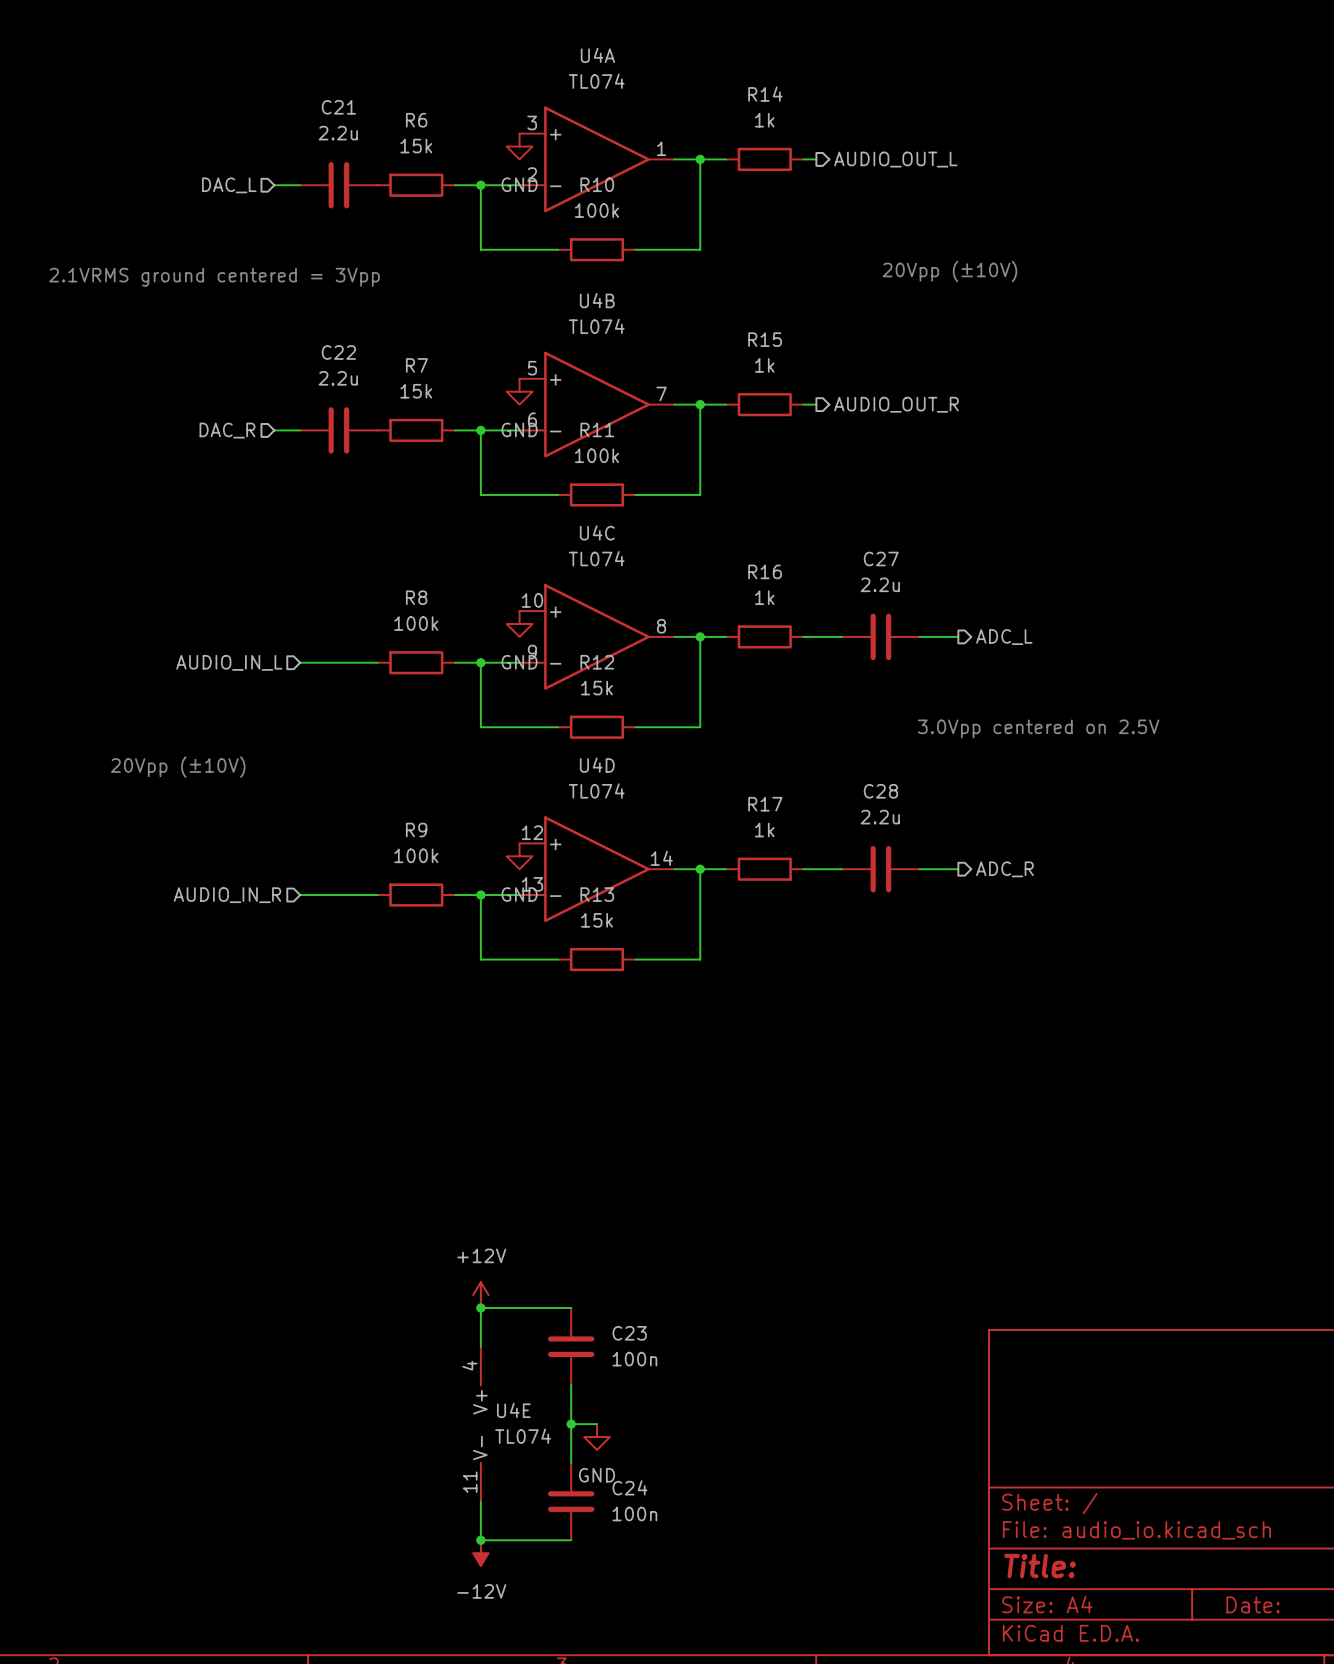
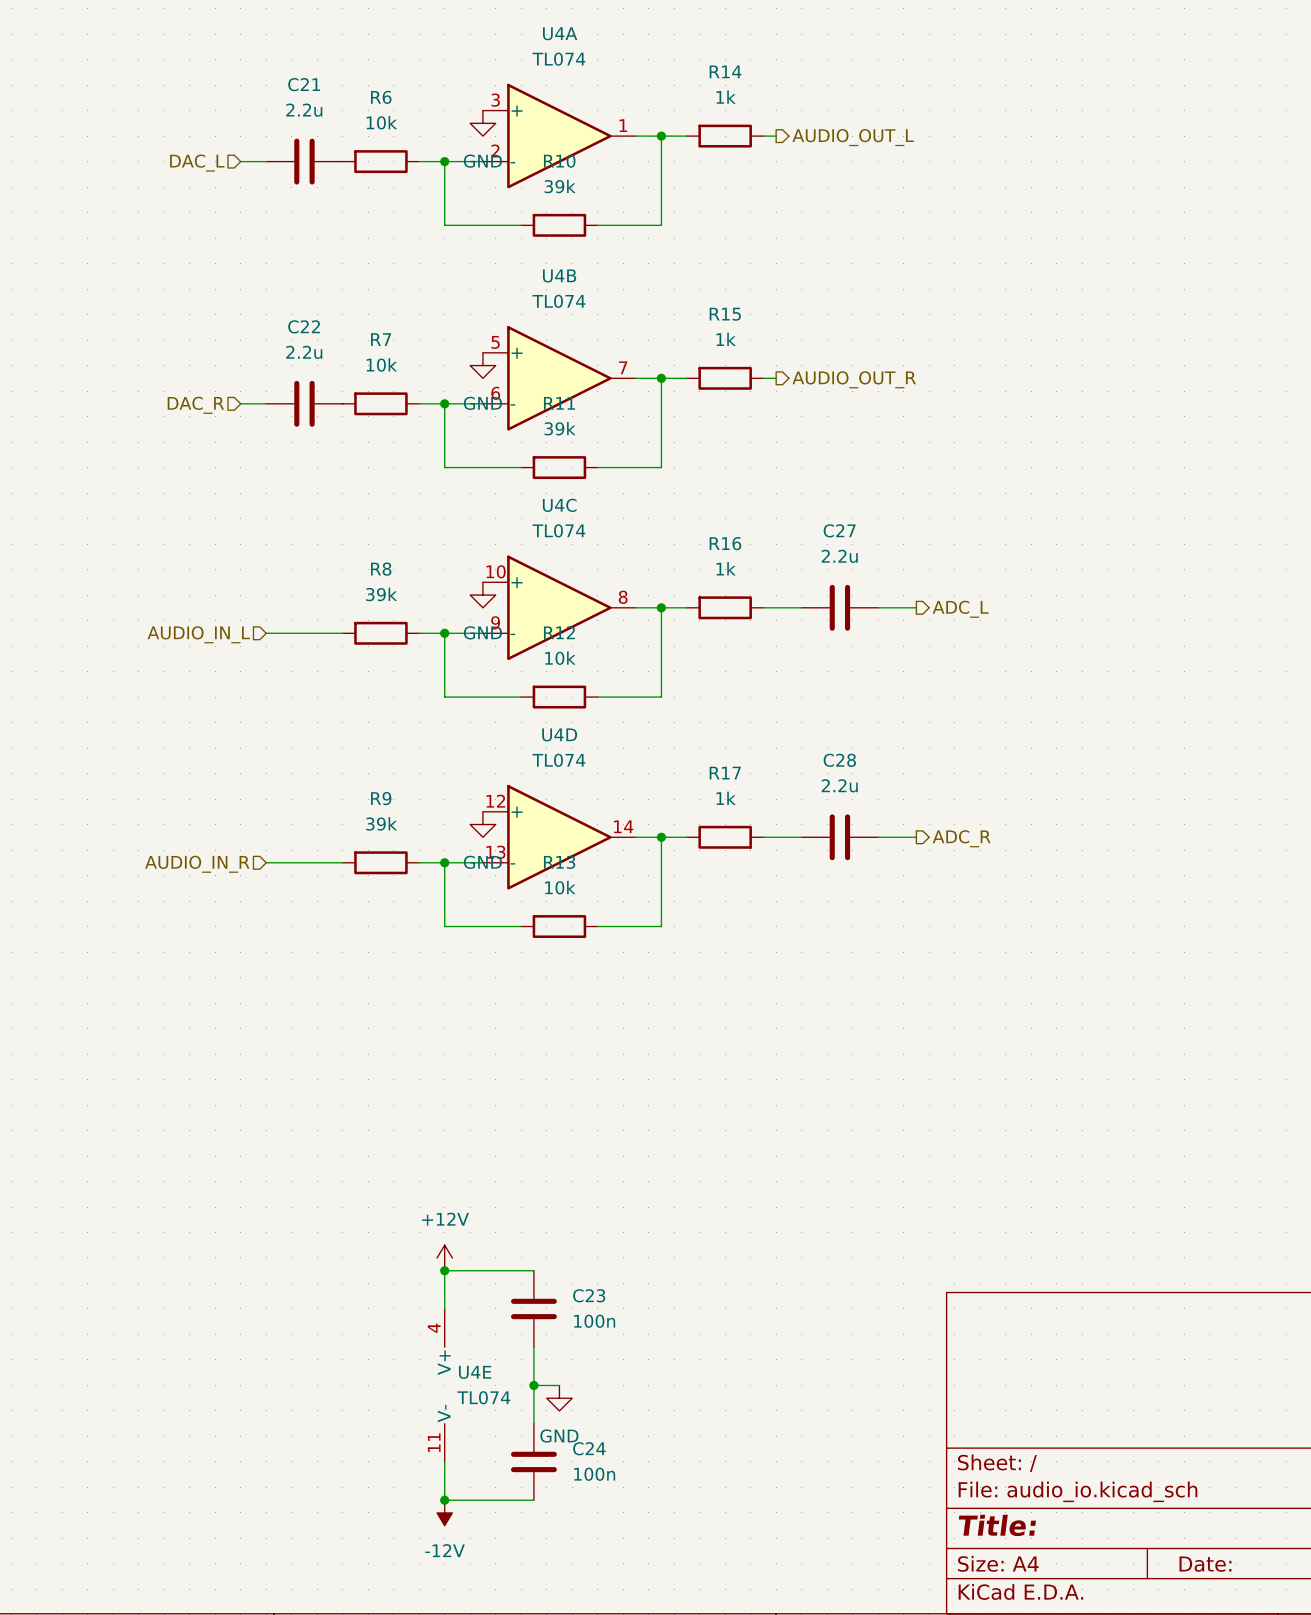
R6 value: 15k (416, 146) -> 10k (381, 122)
R10 value: 100k (597, 210) -> 39k (560, 186)
text: 20Vpp (±10V) (949, 271) -> none
text: 2.1VRMS ground centered = 3Vpp (214, 277) -> none
R7 value: 15k (416, 391) -> 10k (381, 364)
R11 value: 100k (597, 455) -> 39k (560, 428)
R8 value: 100k (416, 623) -> 39k (381, 594)
R12 value: 15k (597, 688) -> 10k (560, 658)
text: 3.0Vpp centered on 2.5V (1038, 728) -> none
text: 20Vpp (±10V) (178, 767) -> none
R9 value: 100k (416, 855) -> 39k (381, 823)
R13 value: 15k (597, 920) -> 10k (560, 887)

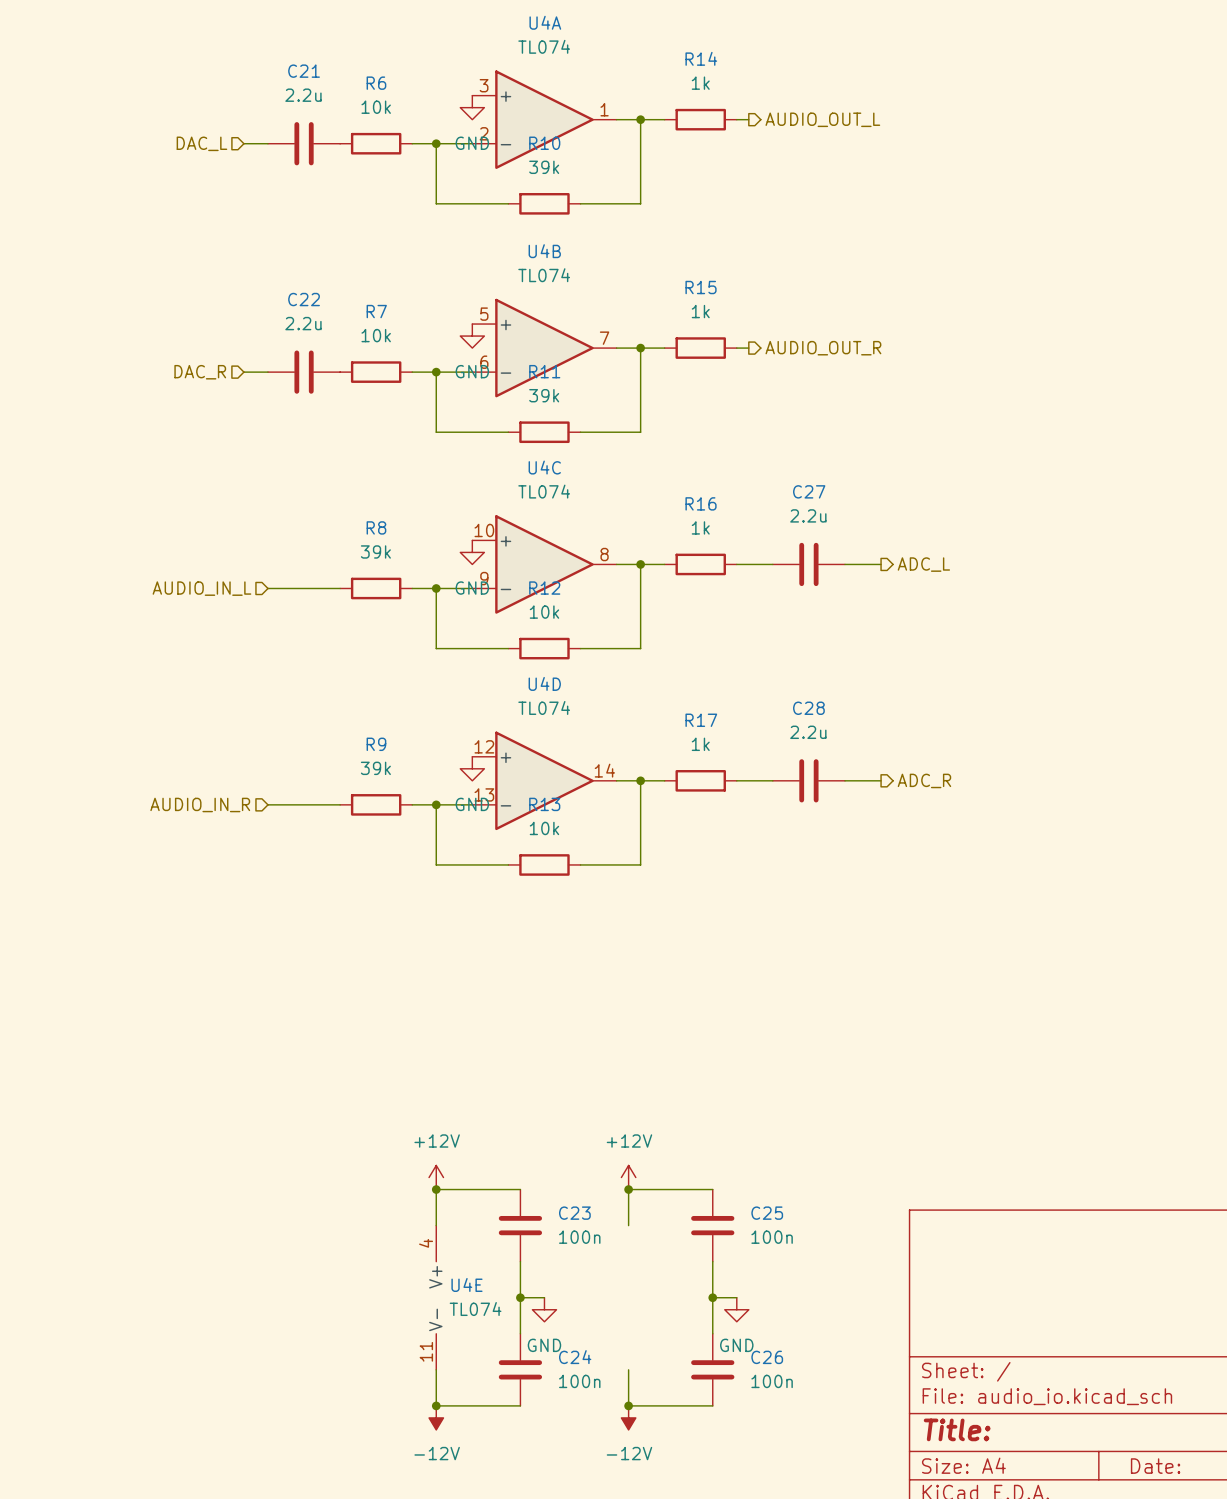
power symbol: none -> +12V (628, 1177)
junction: none -> (628, 1189)
wire: none -> (712, 1189) (628, 1189) (628, 1225)
C25: none -> 100n (712, 1225)
wire: none -> (712, 1261) (712, 1333)
wire: none -> (712, 1297) (736, 1297)
junction: none -> (712, 1297)
power symbol: none -> GND (736, 1309)
wire: none -> (628, 1369) (628, 1405) (712, 1405)
C26: none -> 100n (712, 1369)
junction: none -> (628, 1405)
power symbol: none -> -12V (628, 1417)

